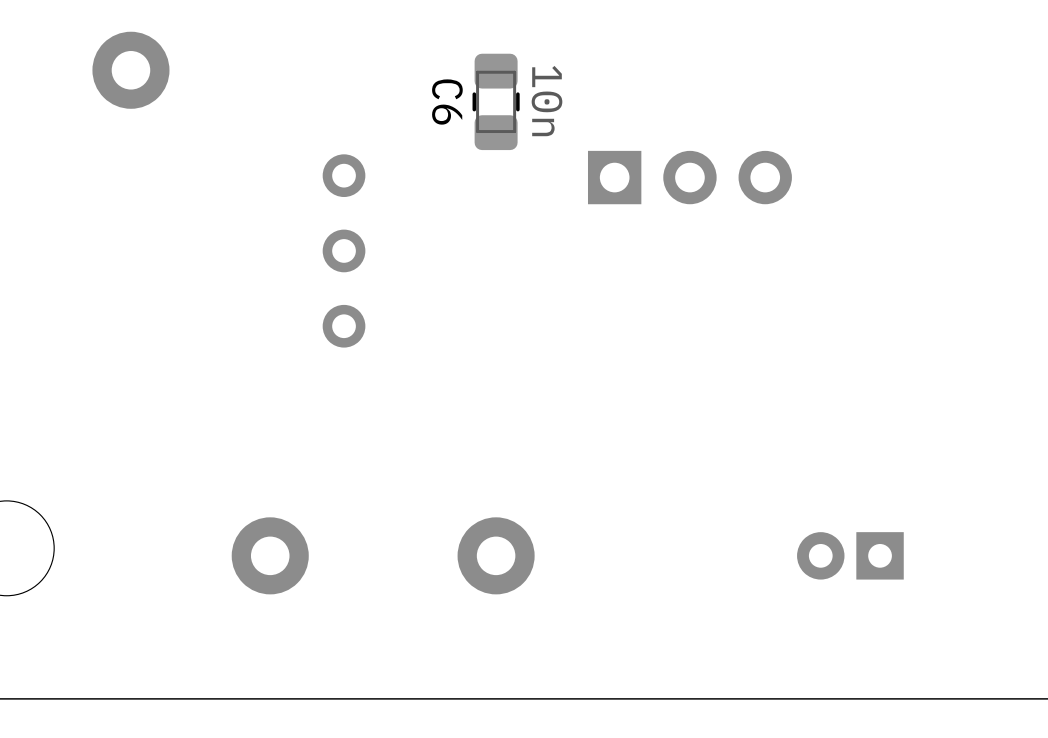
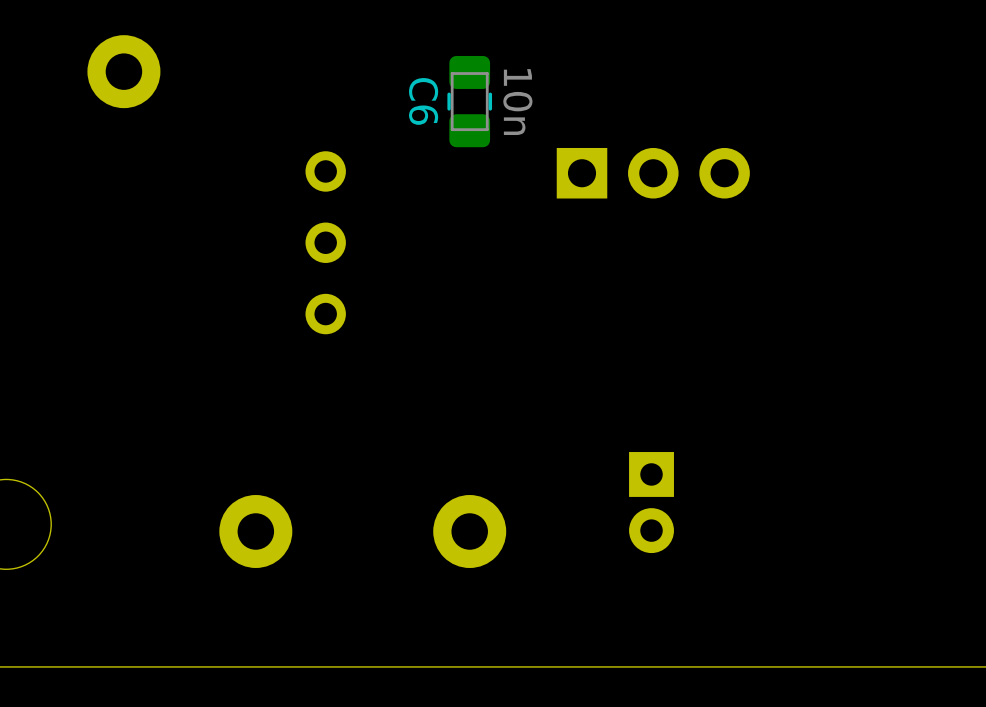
part rotation: 0° (850, 555) -> 90° counterclockwise (651, 502)
part position: (850, 555) -> (651, 502)

